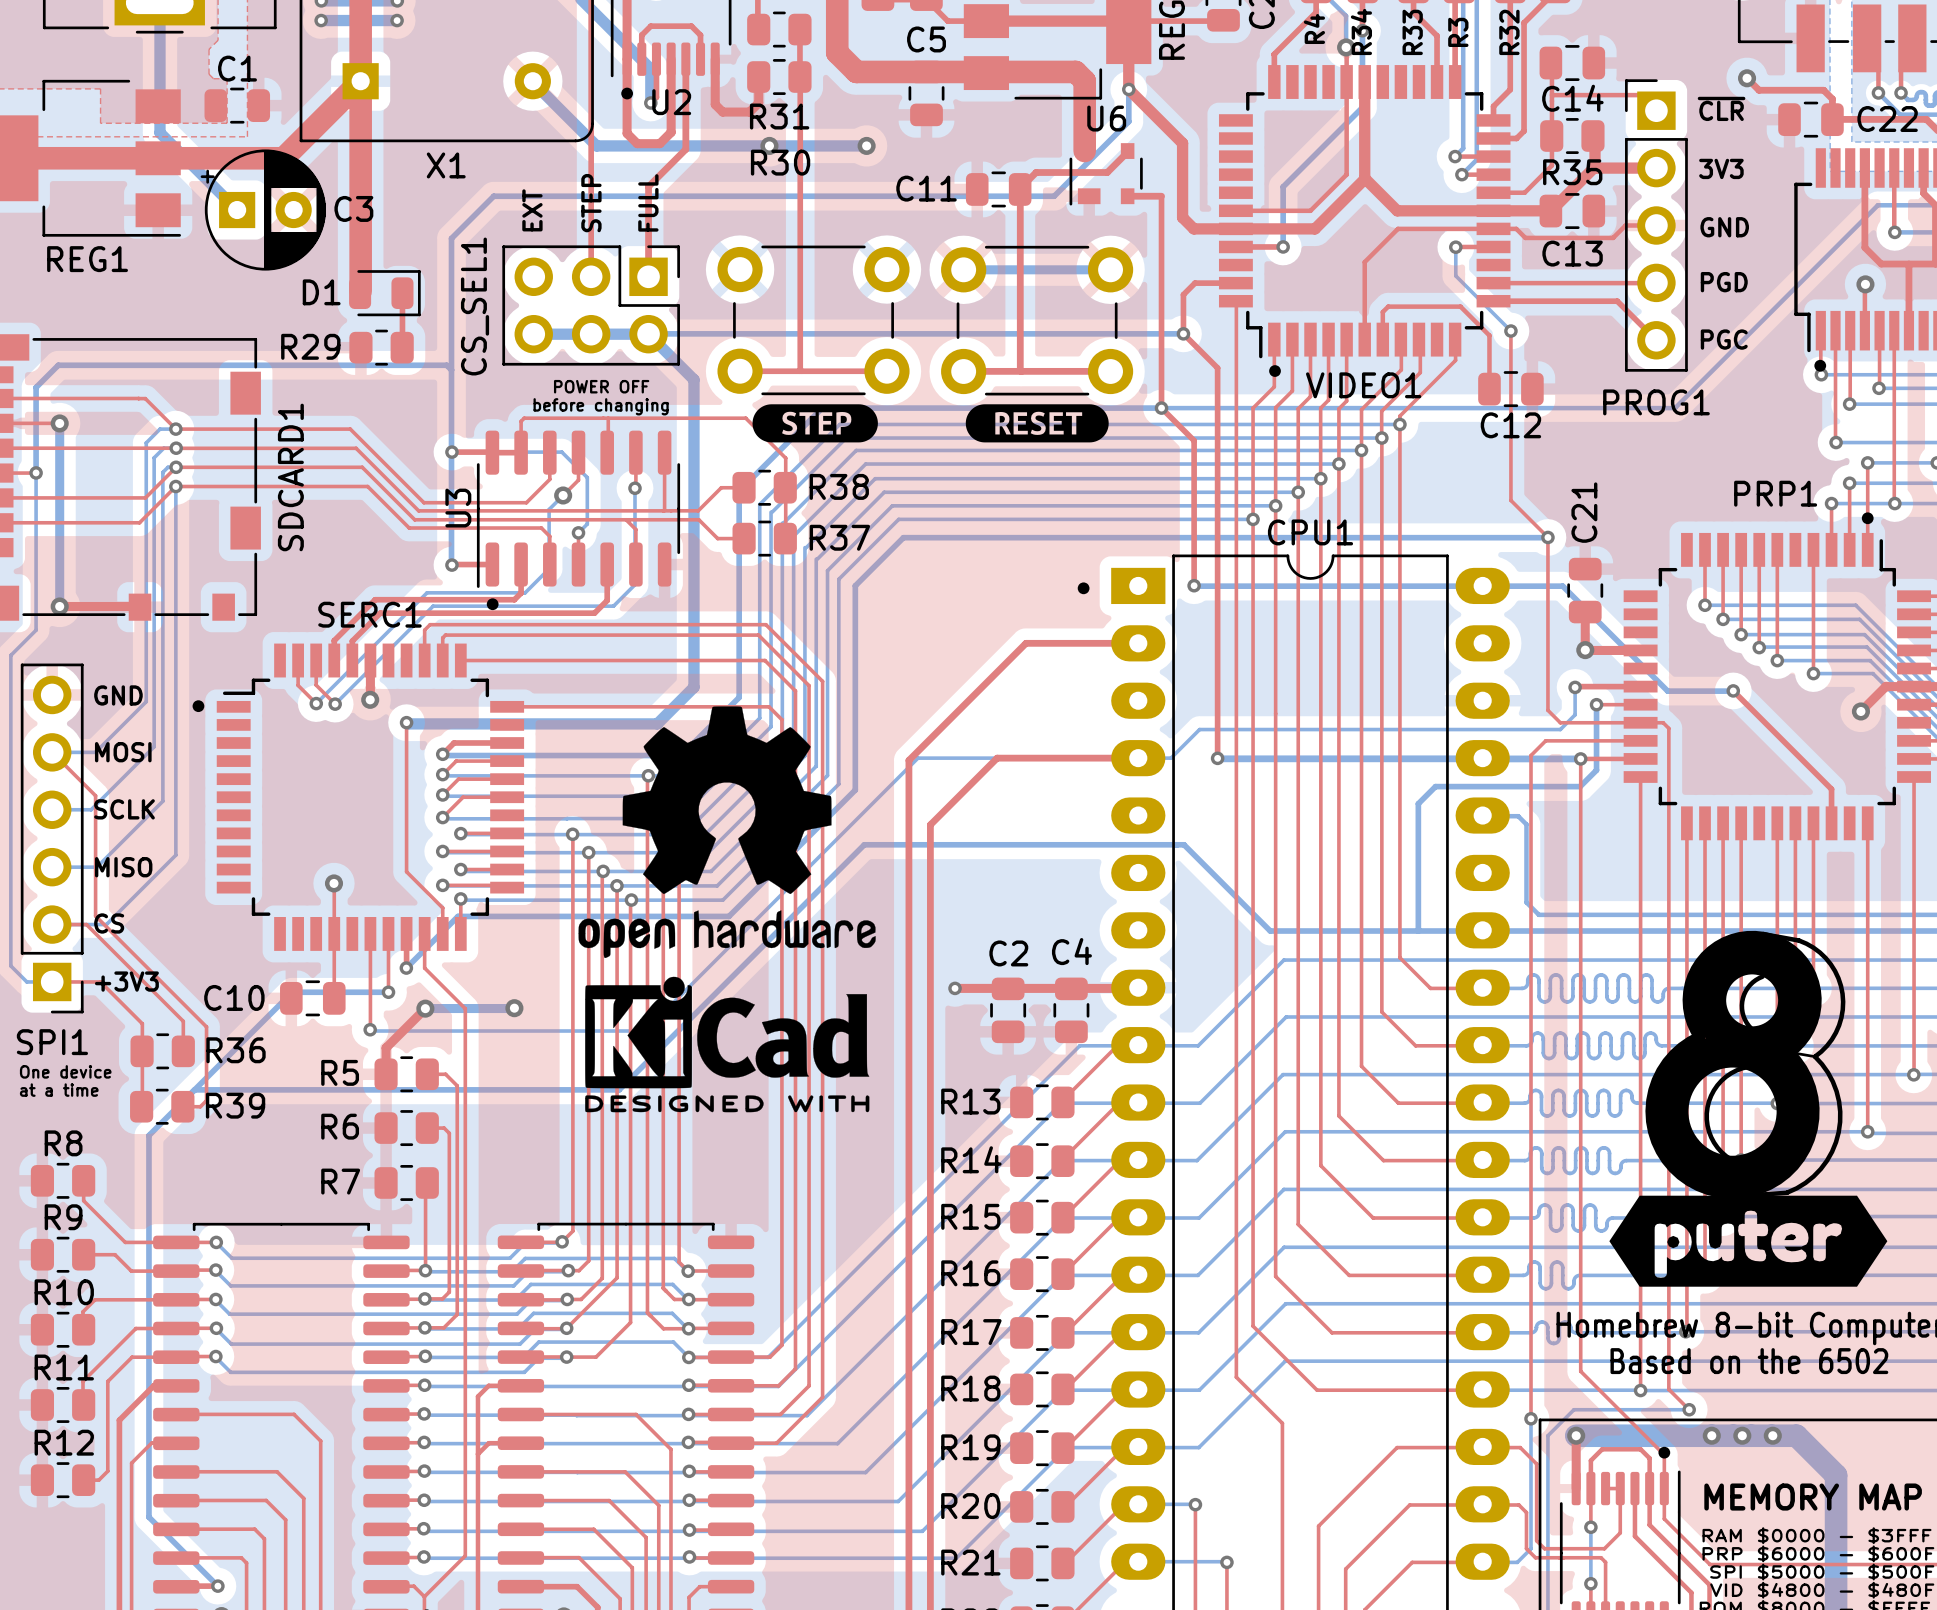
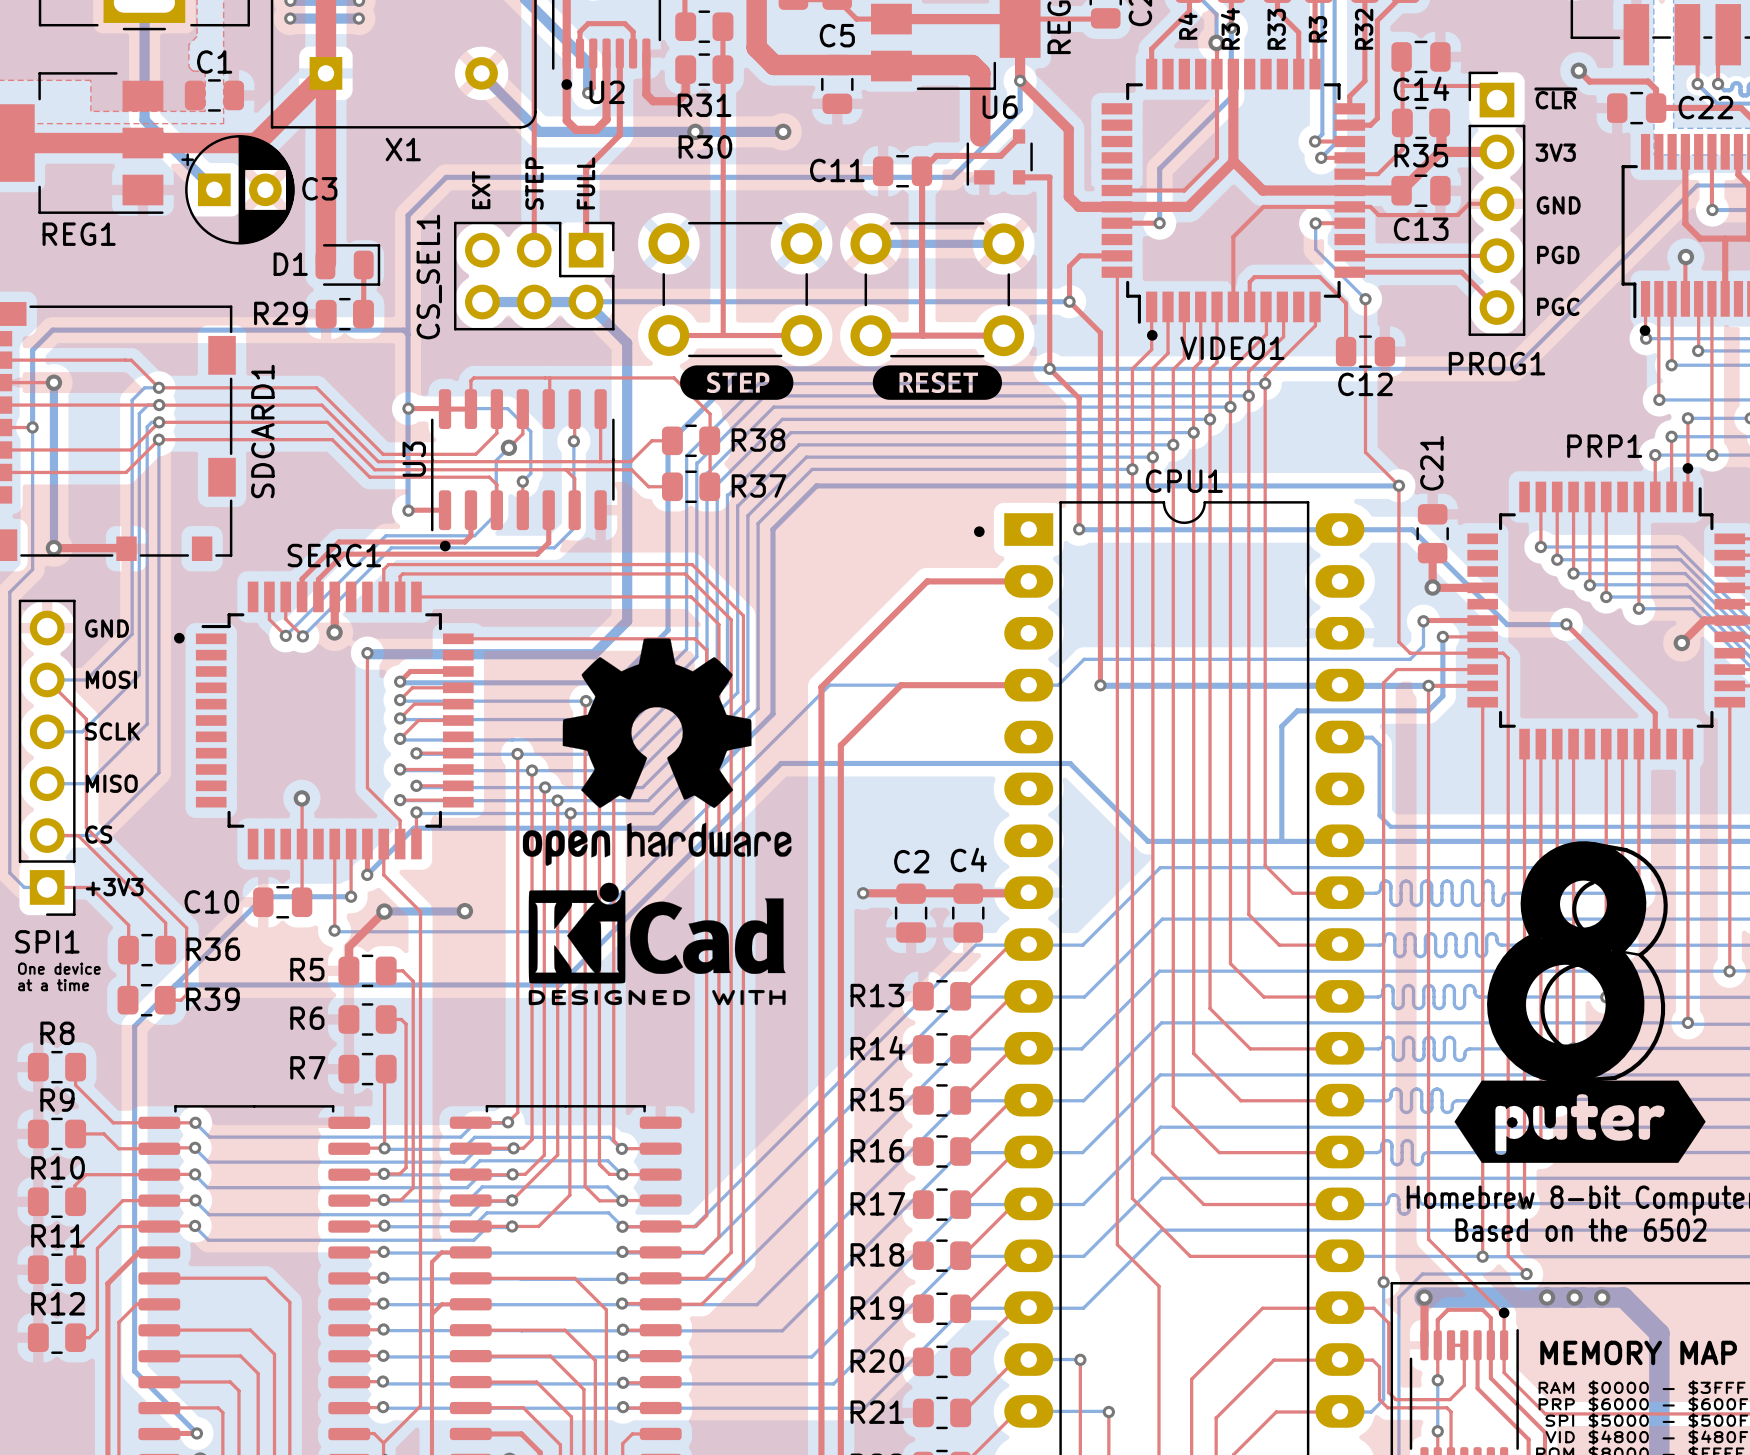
text: POWER OFF (601, 386) -> none
text: before changing (601, 406) -> none

